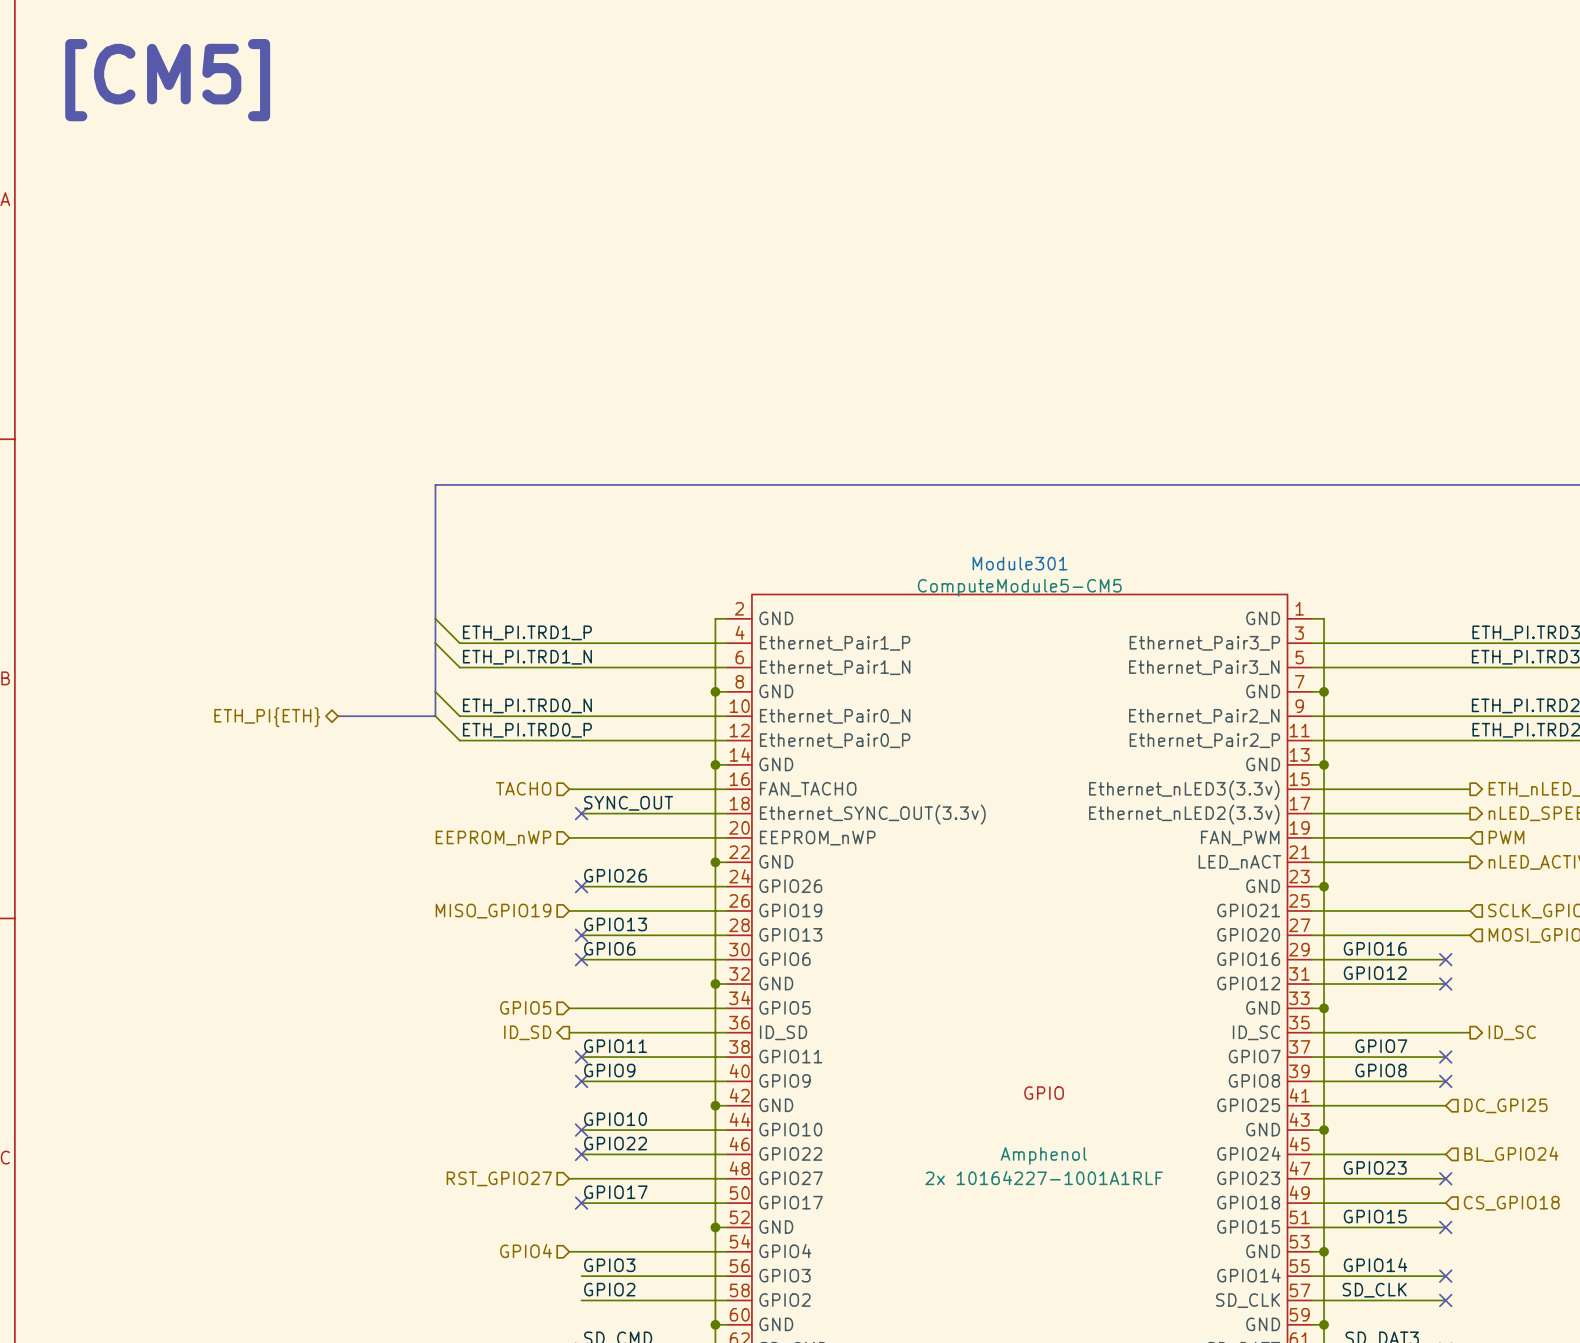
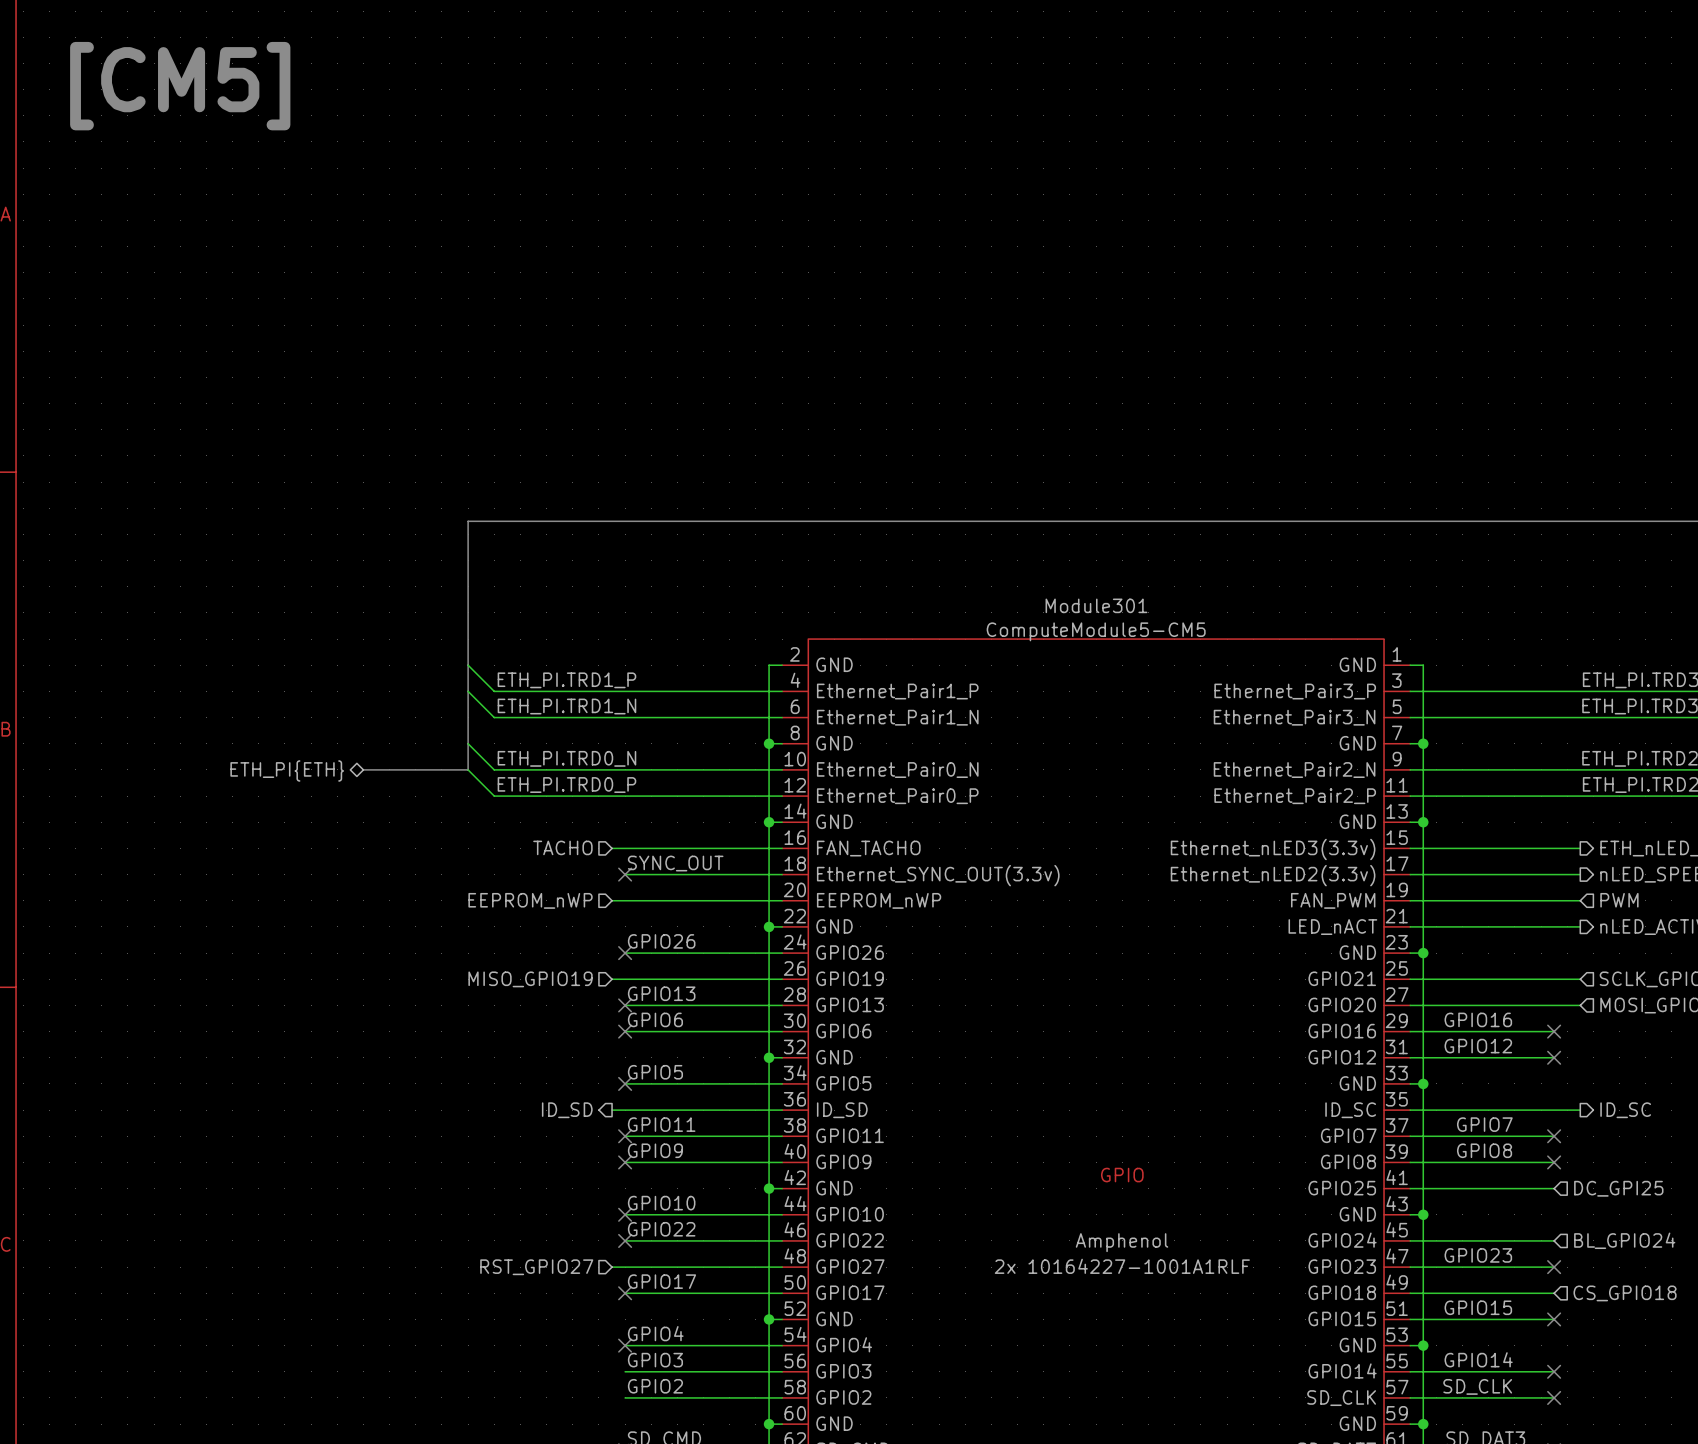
label: none -> GPIO5 (655, 1072)
hierarchical label: GPIO5 (525, 1007) -> none
wire: (569, 1008) (581, 1008) -> none
no-connect mark: none -> (625, 1083)
label: none -> GPIO4 (655, 1333)
hierarchical label: GPIO4 (525, 1251) -> none
wire: (569, 1251) (581, 1251) -> none
no-connect mark: none -> (625, 1345)

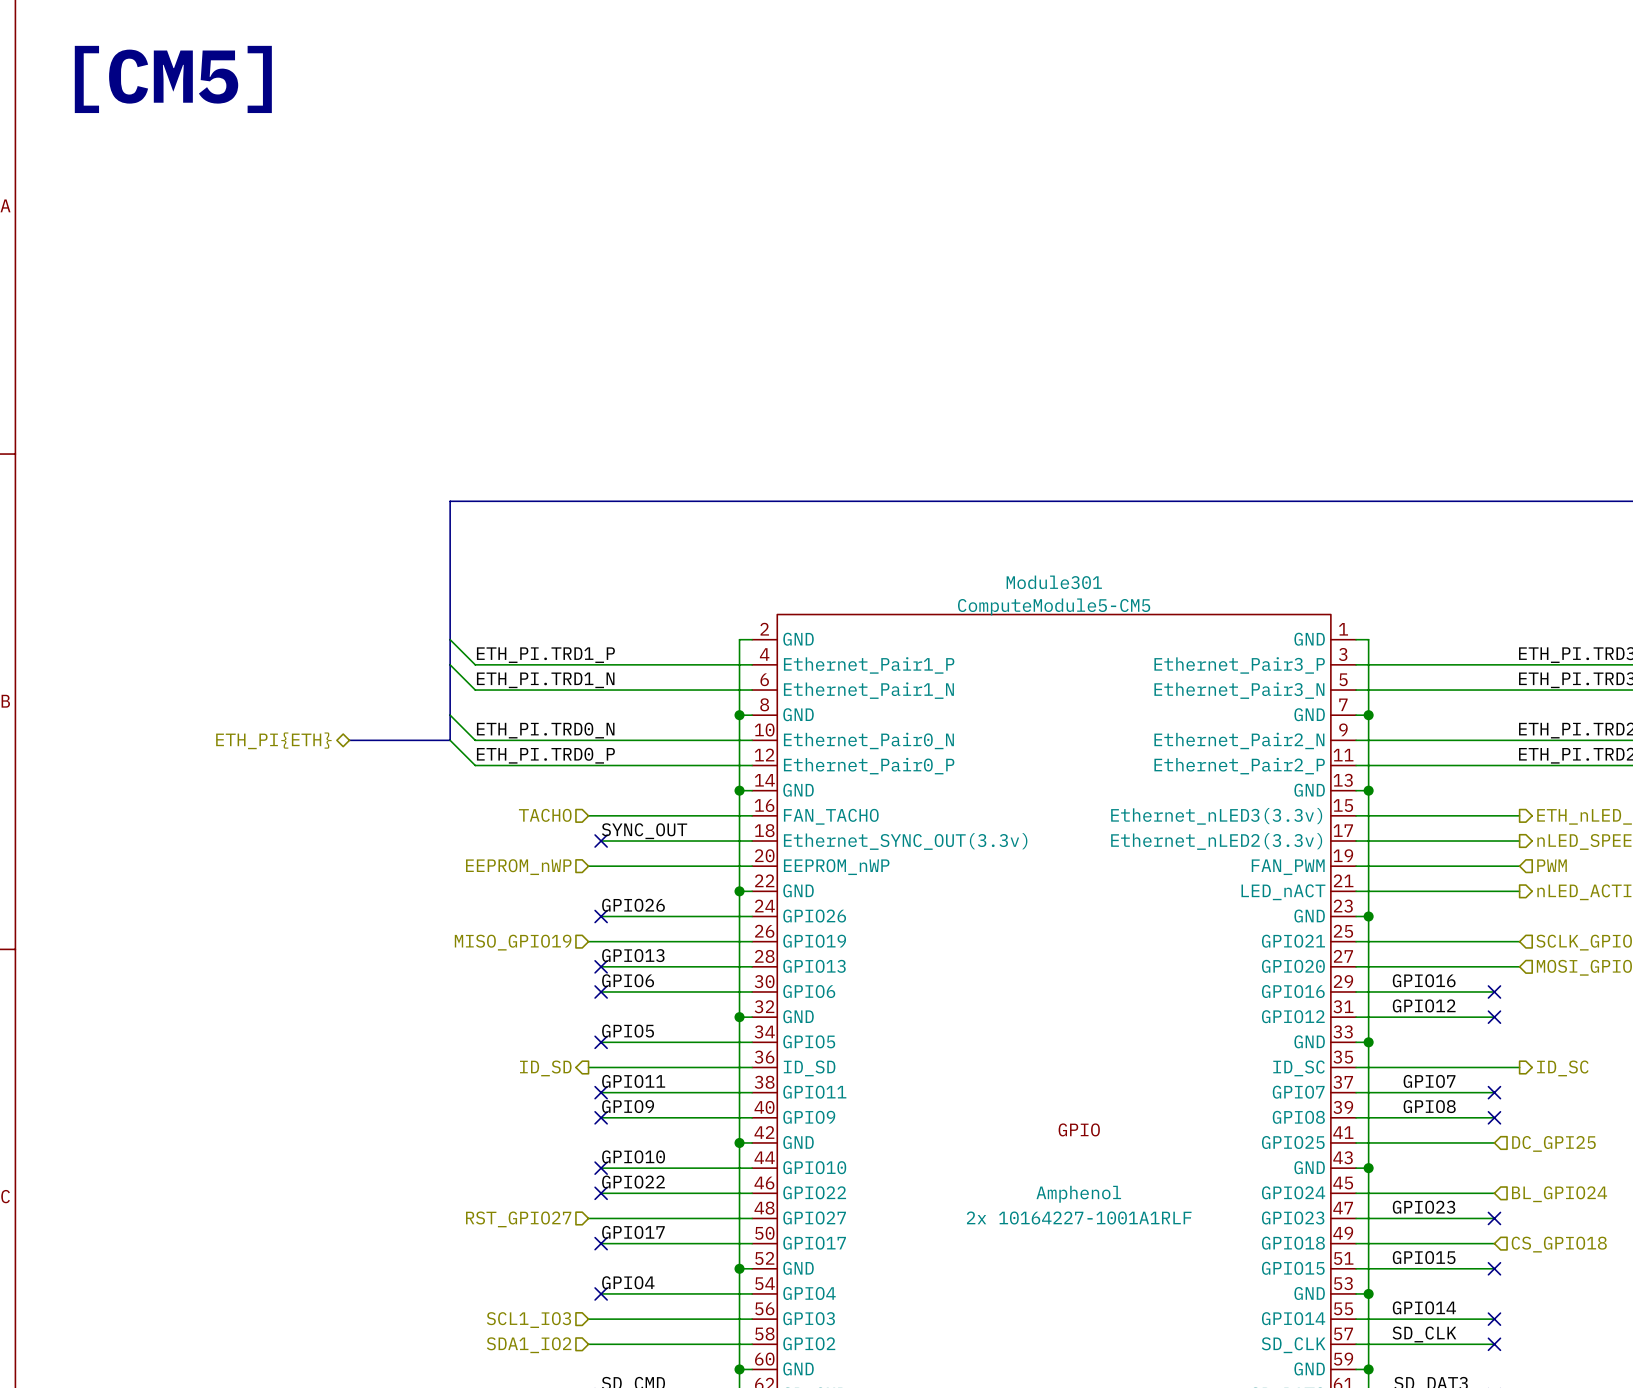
label: GPIO3 (655, 1360) -> none
hierarchical label: none -> SCL1_IO3 (528, 1320)
wire: none -> (588, 1319) (601, 1319)
label: GPIO2 (655, 1386) -> none
wire: none -> (588, 1344) (601, 1344)
hierarchical label: none -> SDA1_IO2 (529, 1345)

